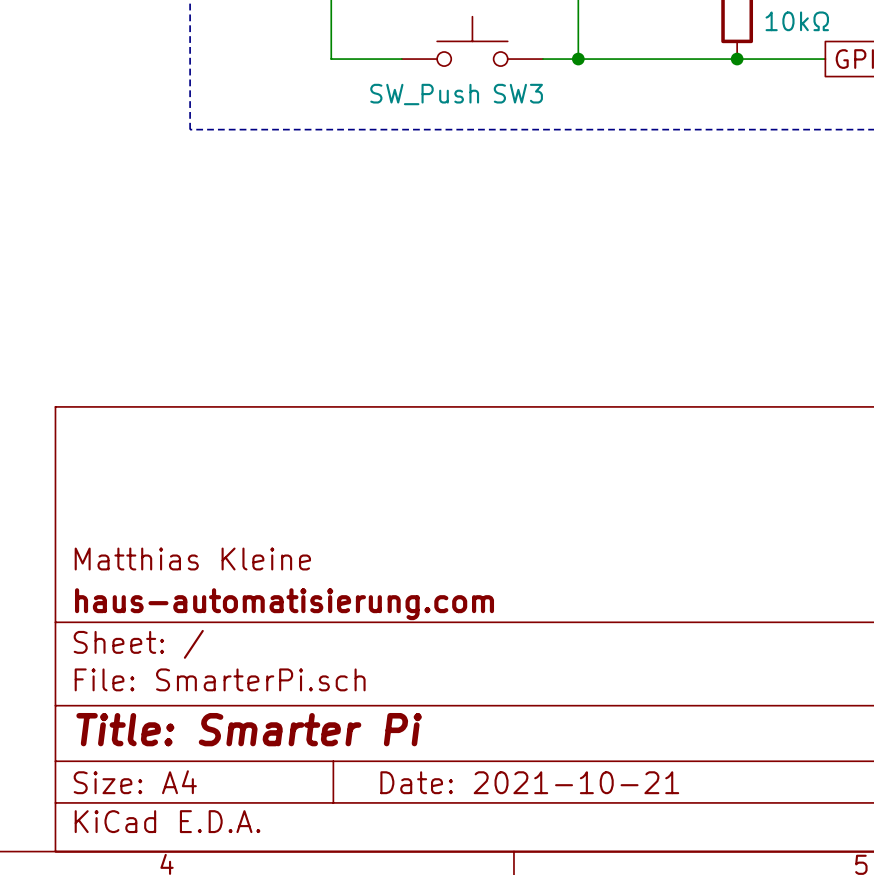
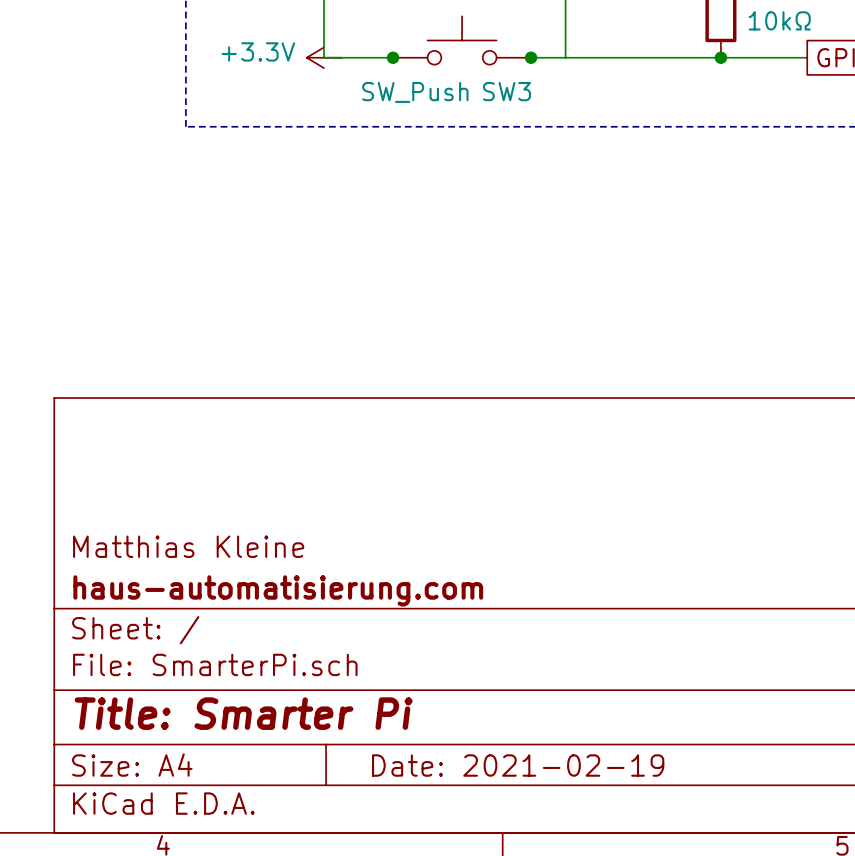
power symbol: none -> +3.3V (323, 57)
junction: none -> (393, 57)
junction position: (578, 59) -> (531, 57)
title block: Date: 2021-10-21 (529, 782) -> Date: 2021-02-19 (518, 765)

